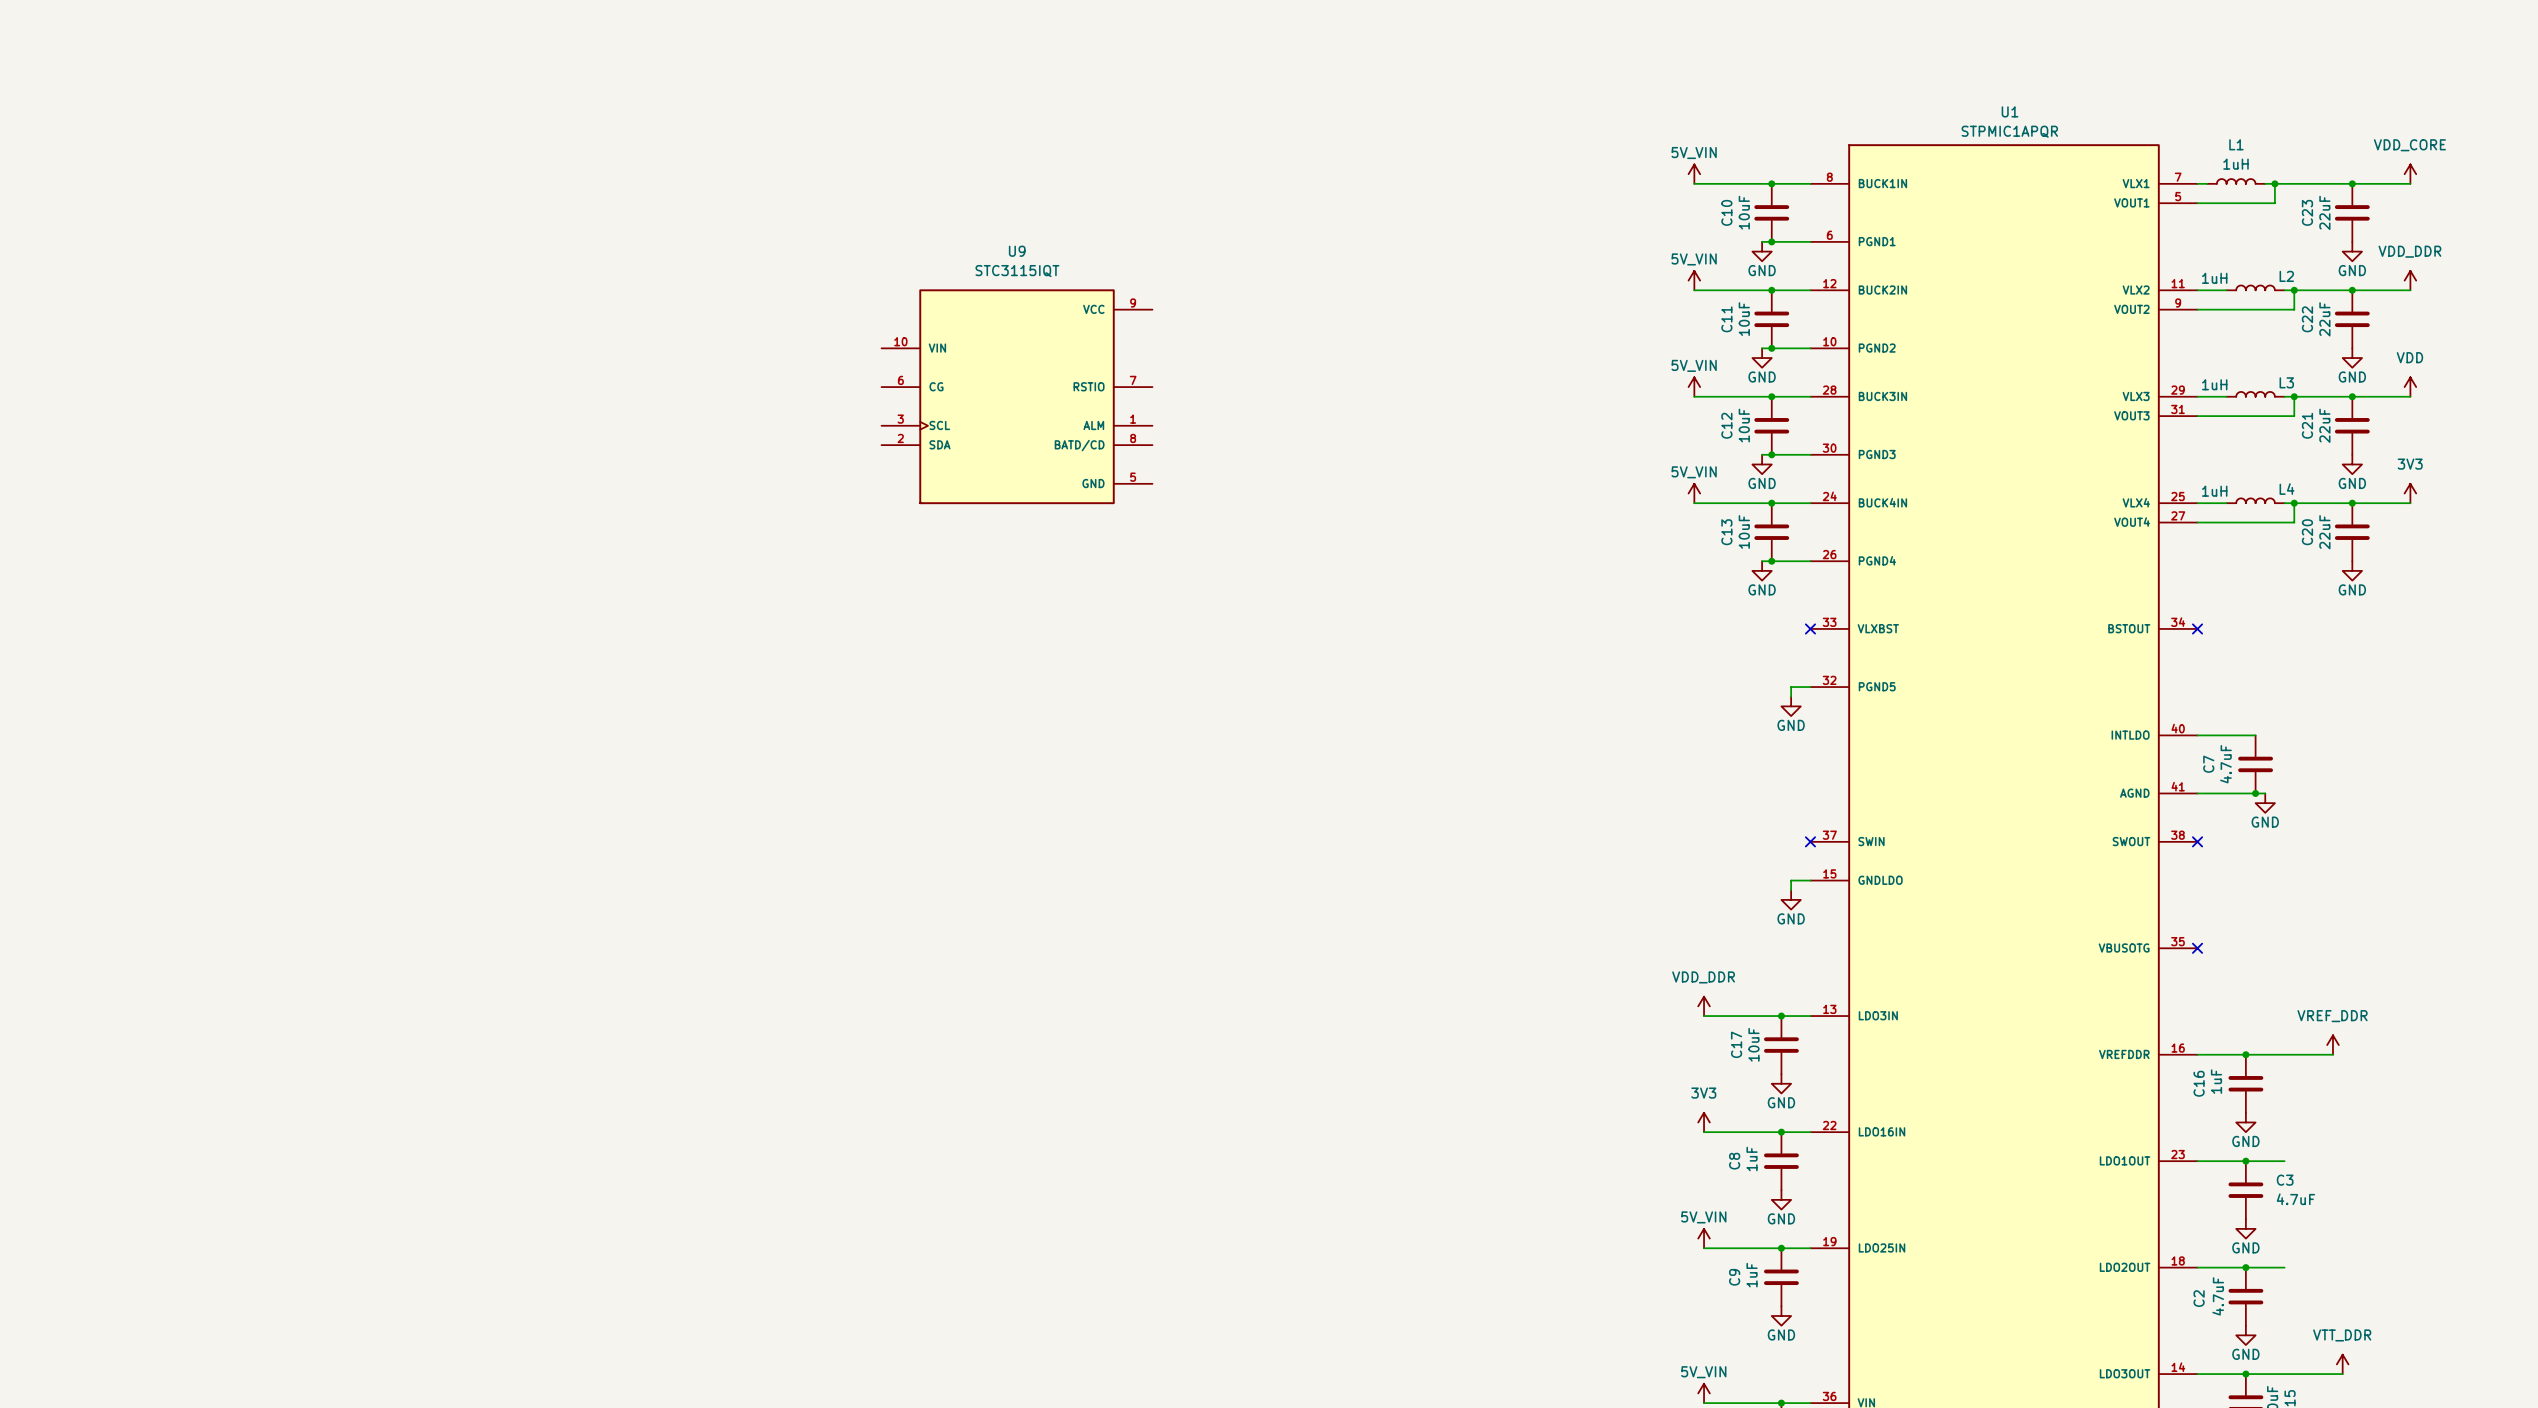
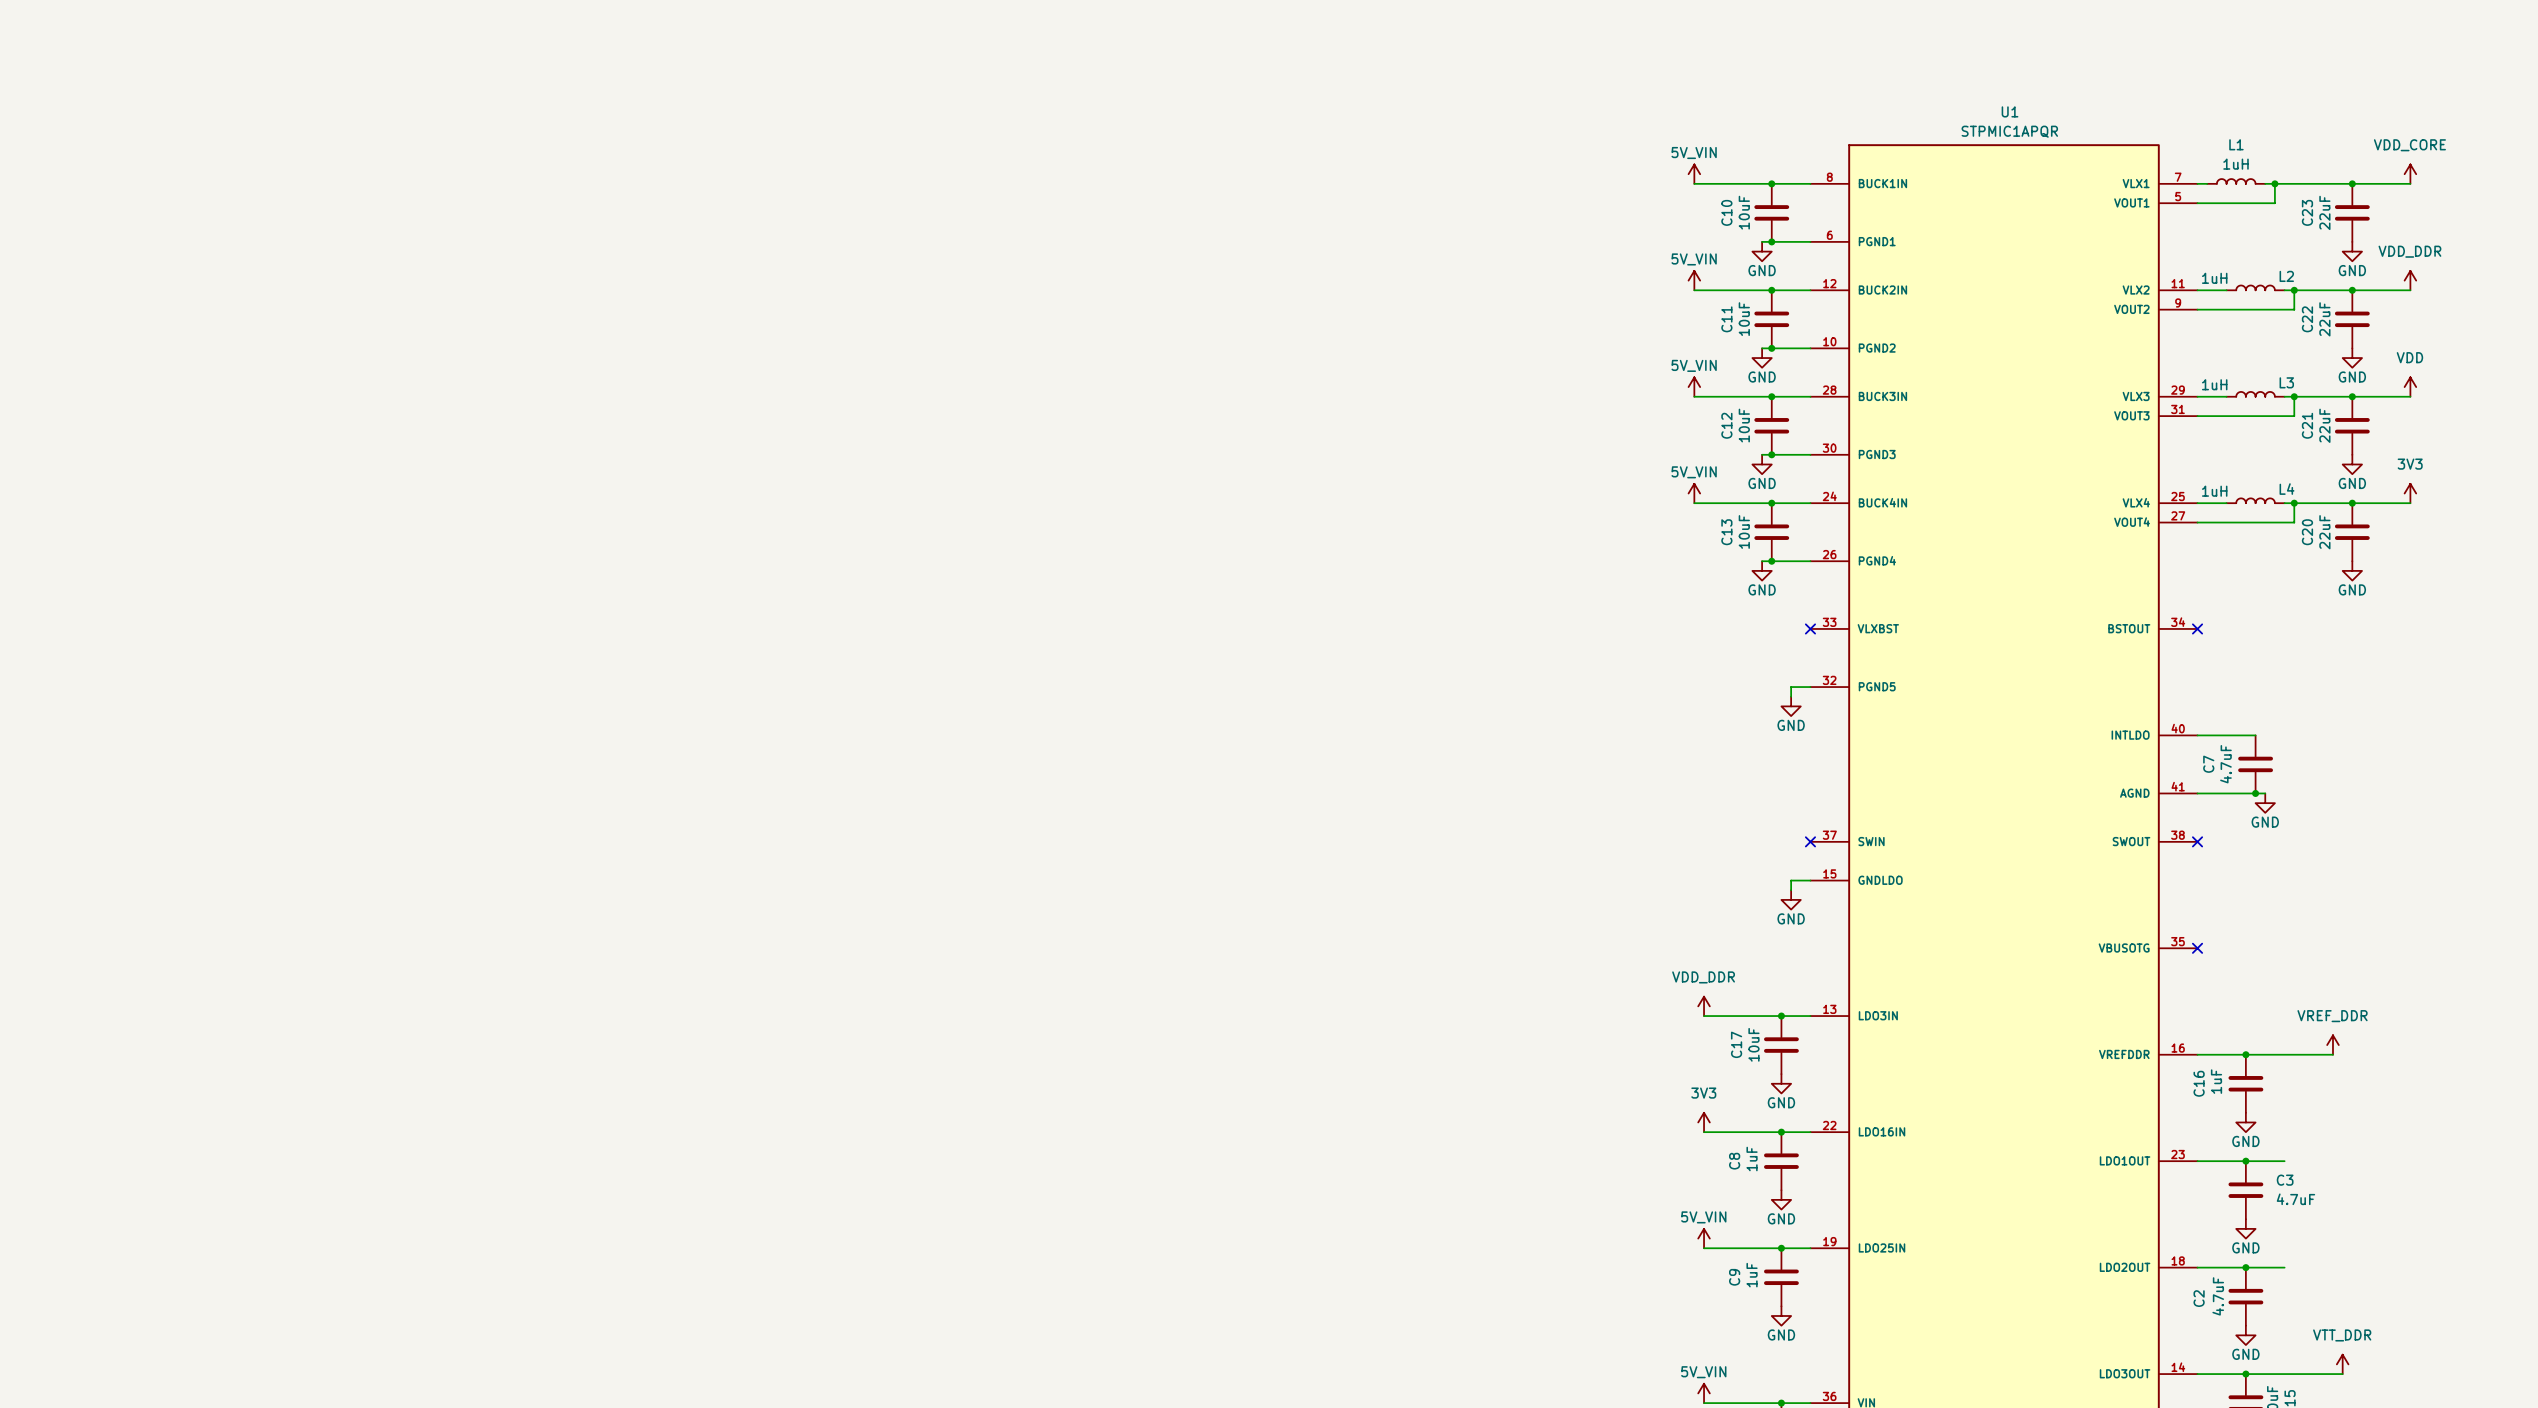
U9: STC3115IQT (1017, 396) -> none

